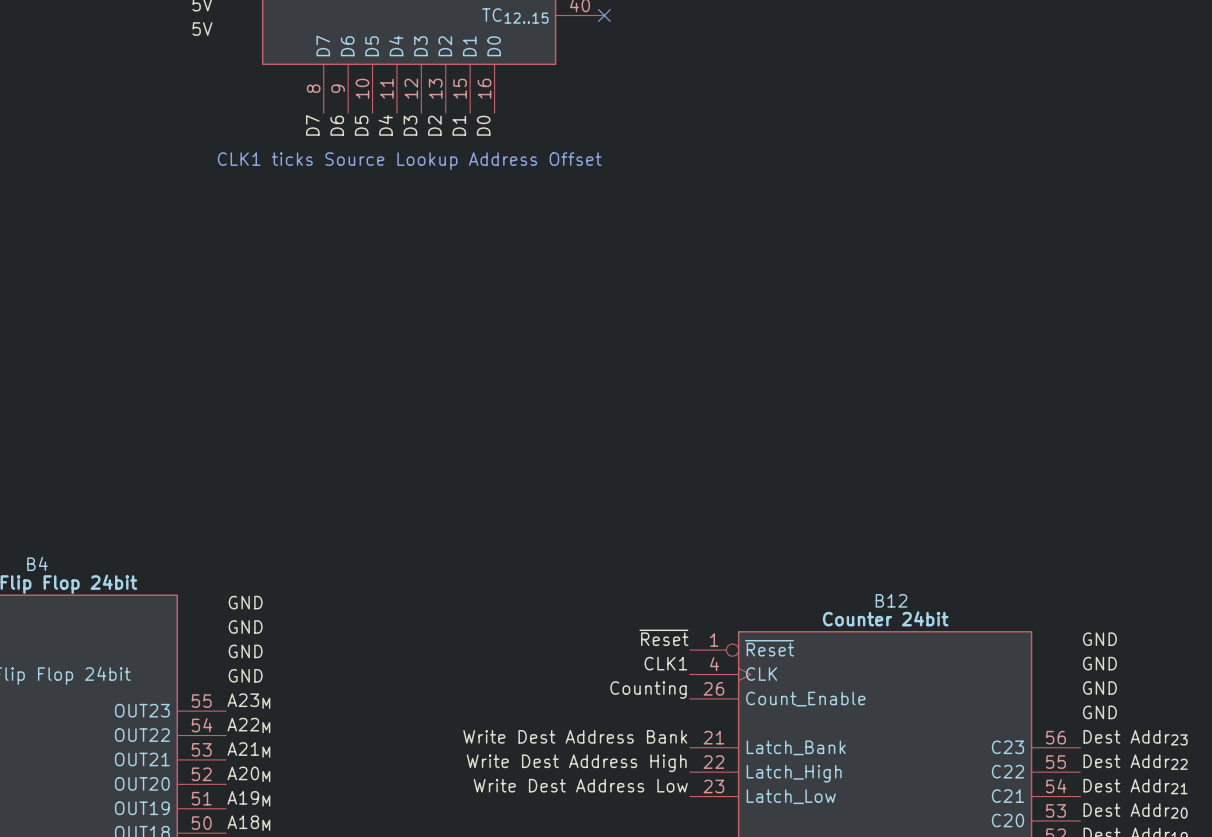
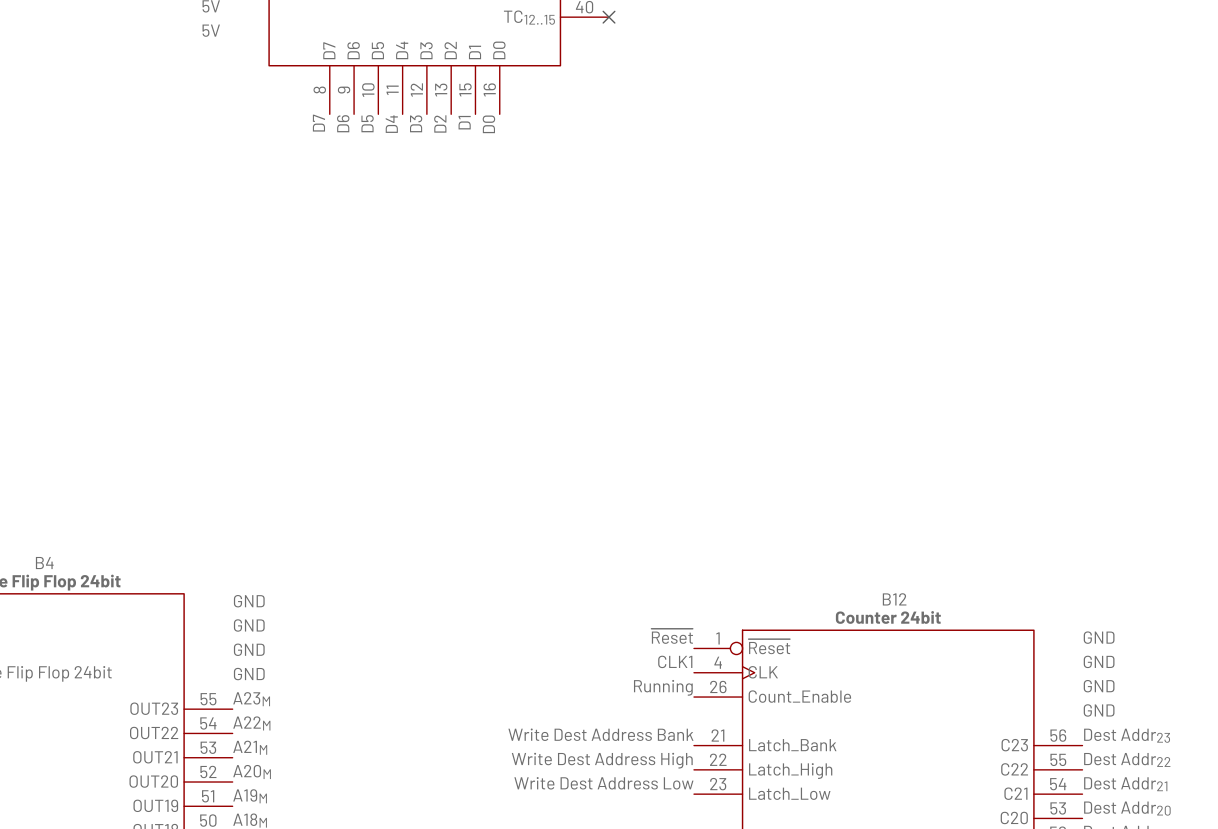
text: CLK1 ticks Source Lookup Address Offset (409, 161) -> none
label: Counting (648, 690) -> Running (663, 687)

